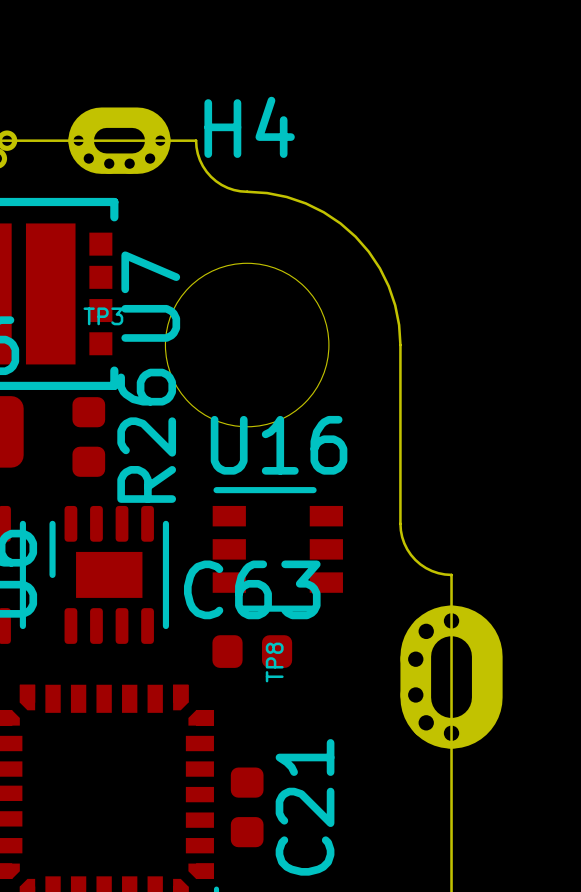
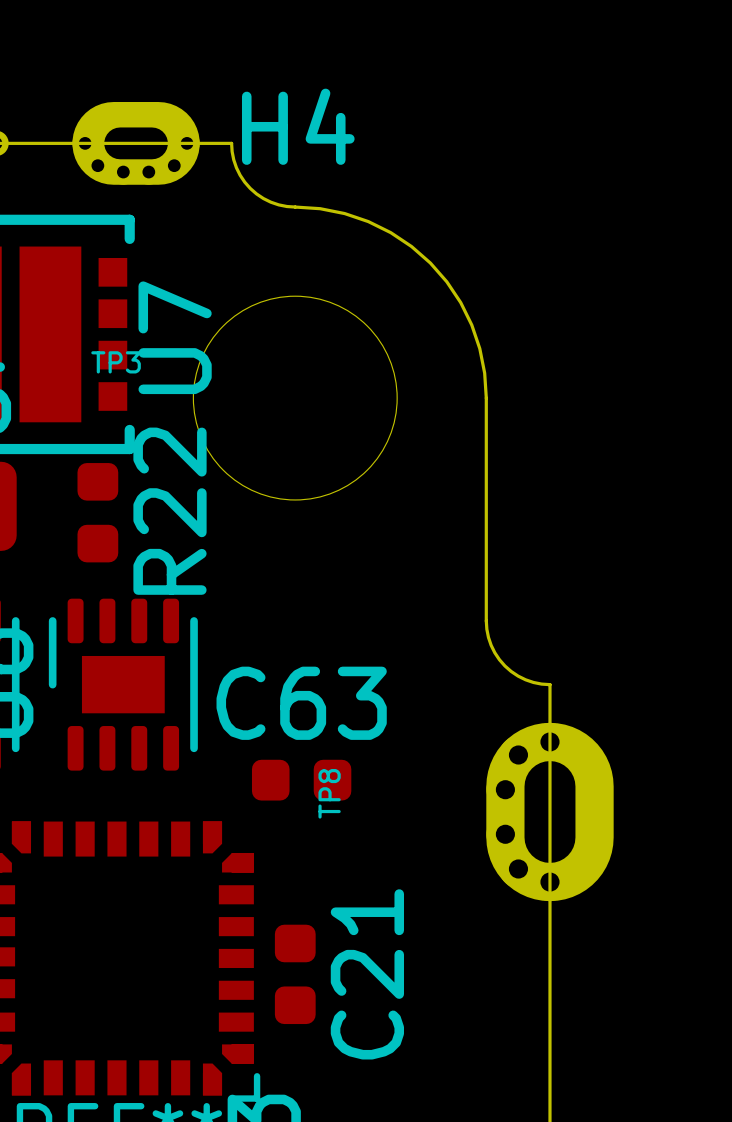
R26 name: R26 (146, 435) -> R22 (169, 511)
U16: (277, 549) -> none

